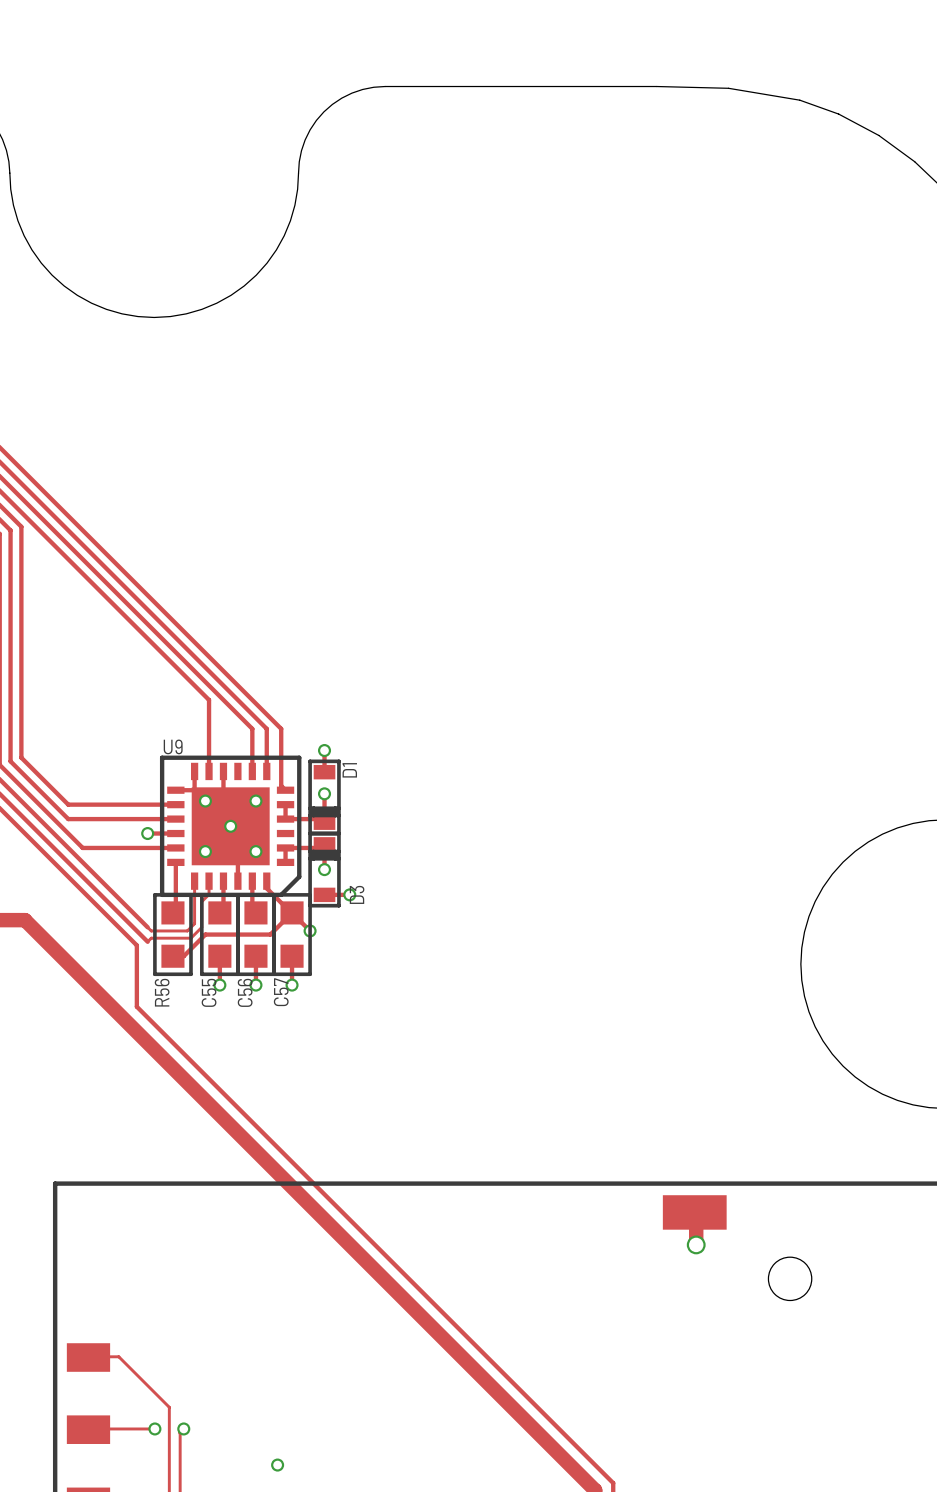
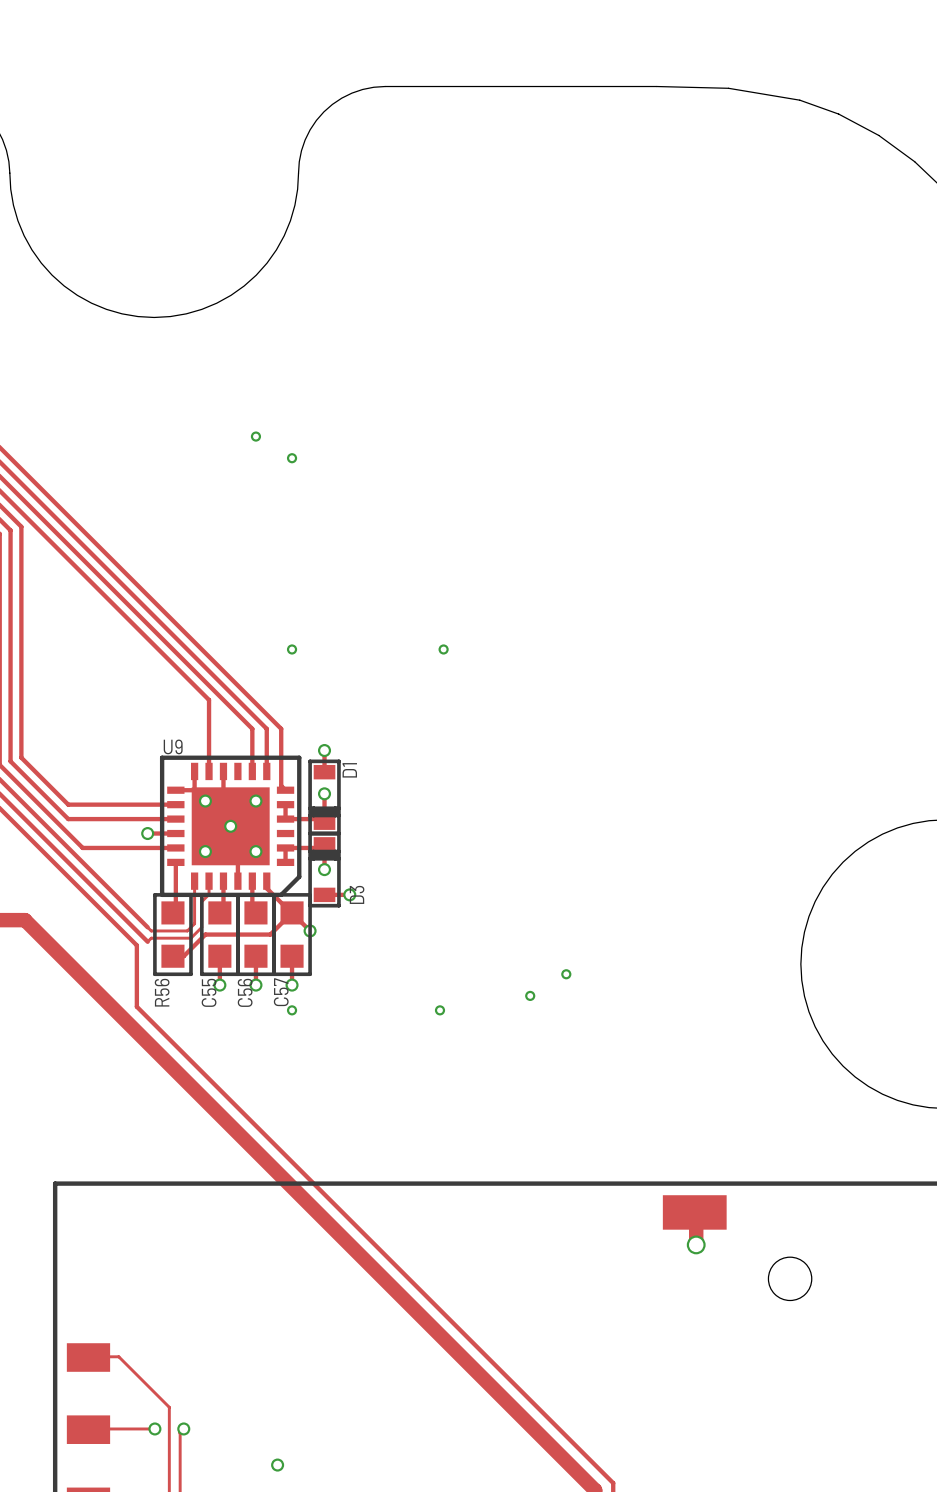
via: none -> (255, 436)
via: none -> (292, 458)
via: none -> (292, 649)
via: none -> (443, 649)
via: none -> (566, 974)
via: none -> (530, 995)
via: none -> (292, 1010)
via: none -> (440, 1010)

